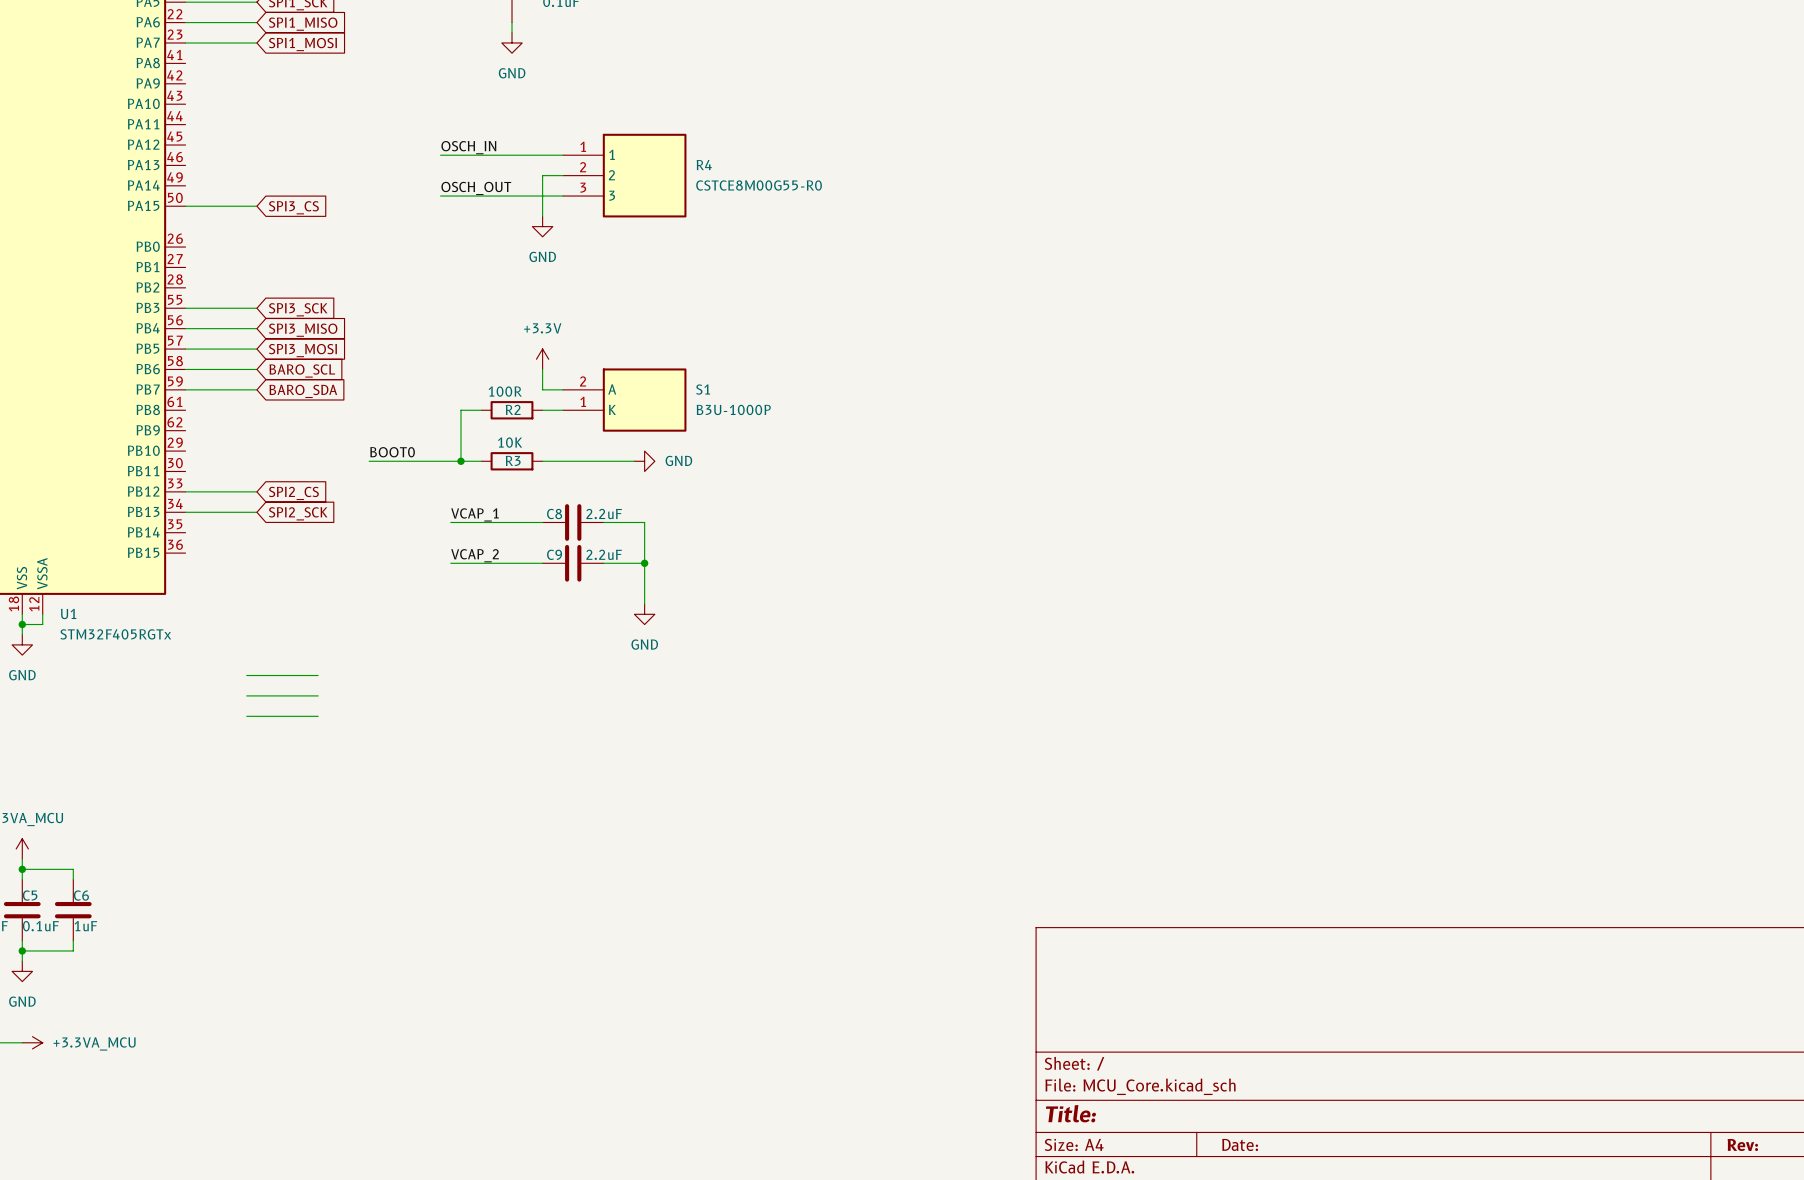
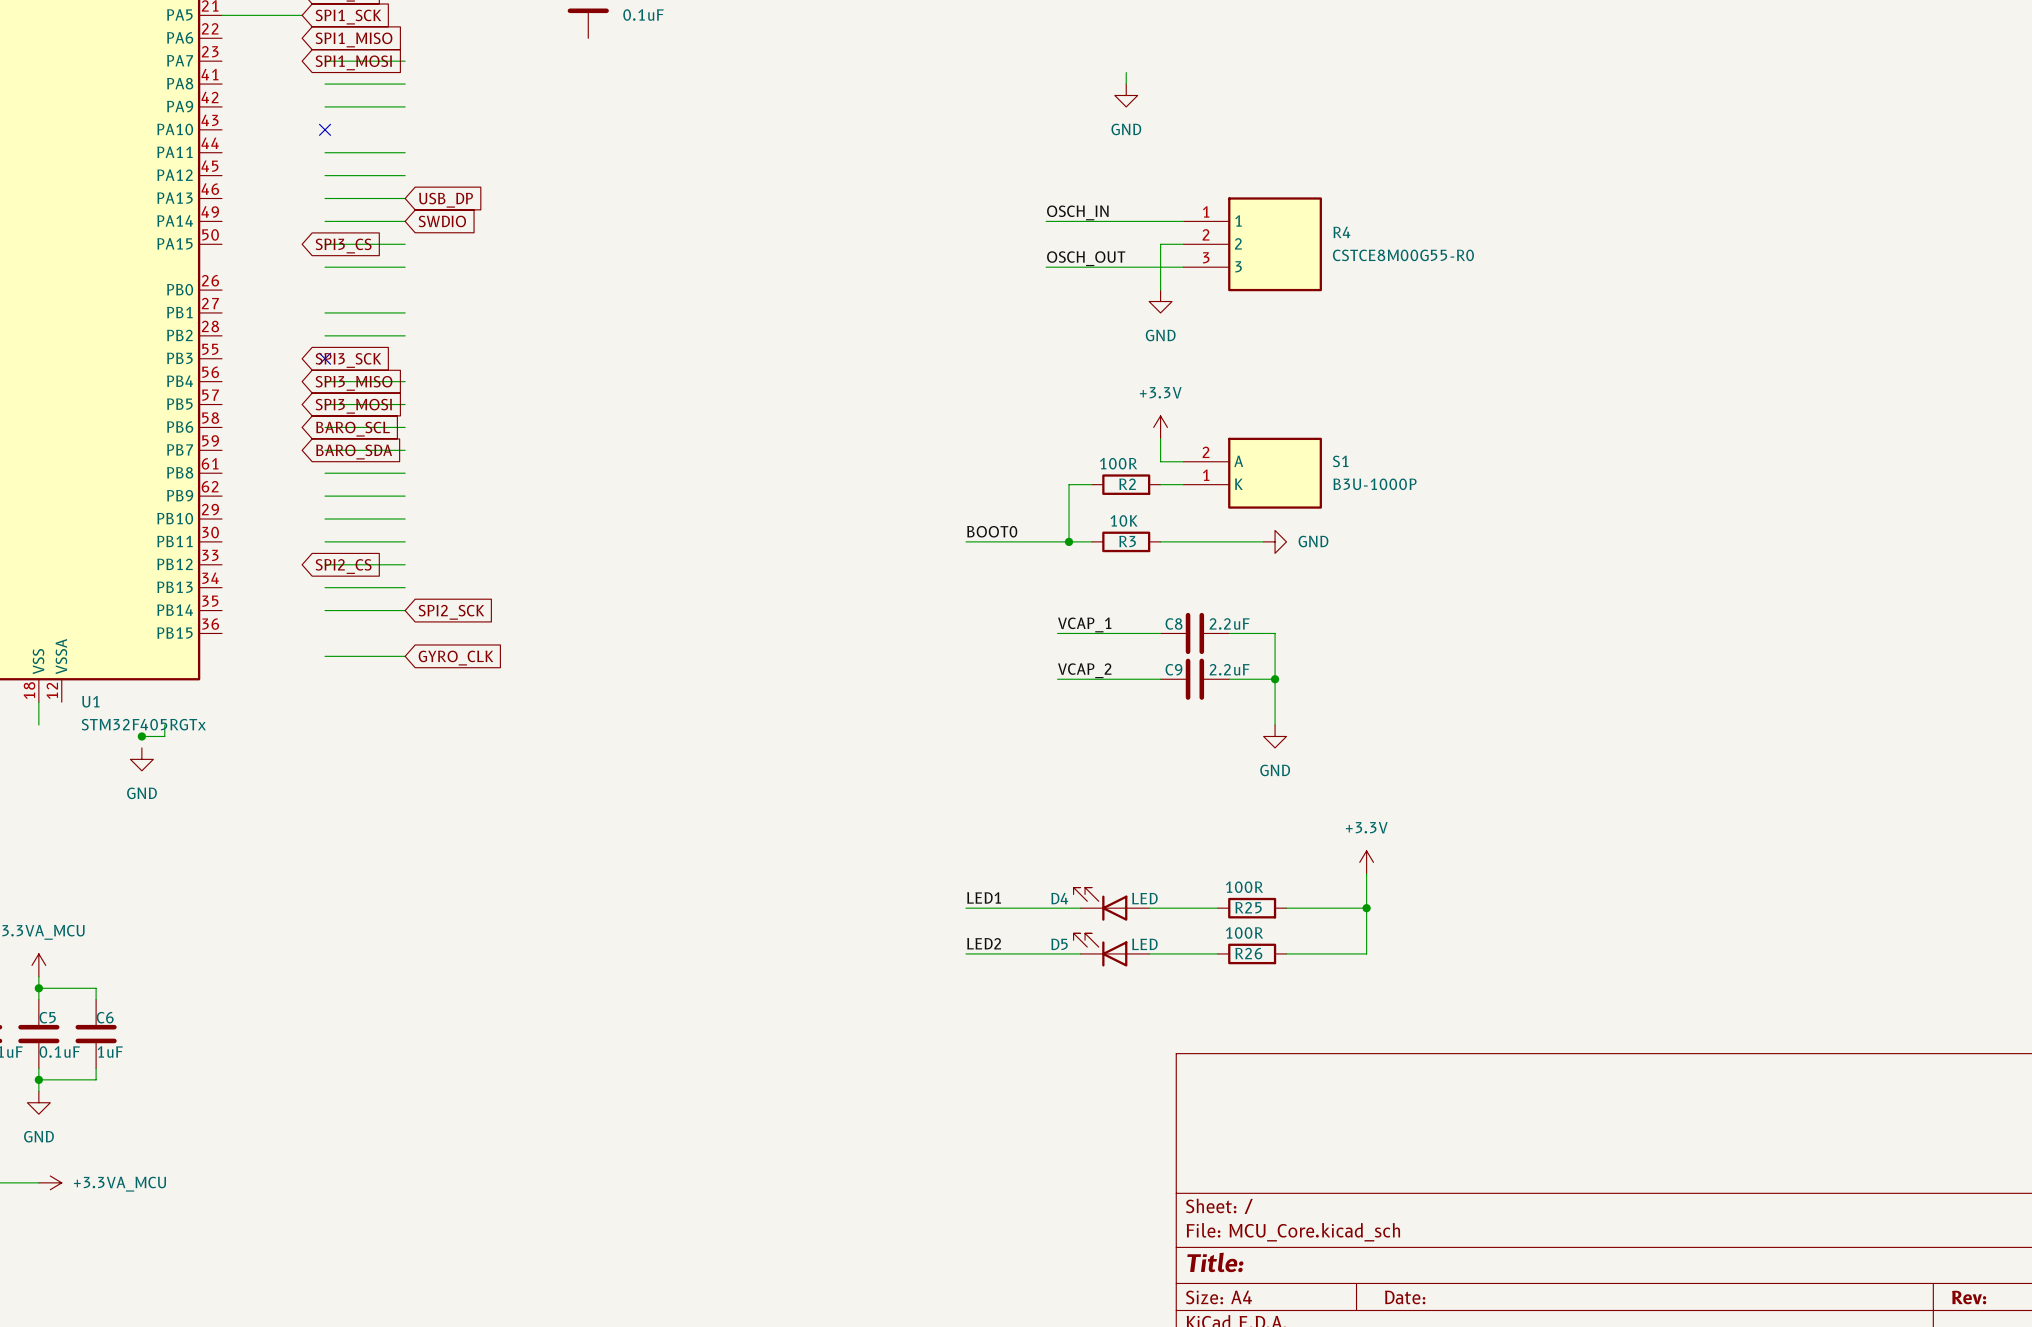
wire: (185, 22) (256, 22) -> (325, 61) (405, 61)
wire: (512, 22) (512, 32) -> none
wire: (185, 42) (256, 42) -> (325, 84) (405, 84)
power symbol: GND (512, 42) -> none
wire: none -> (1126, 72) (1126, 84)
power symbol: none -> GND (1126, 95)
wire: none -> (325, 106) (405, 106)
no-connect mark: none -> (325, 129)
wire: none -> (325, 152) (405, 152)
wire: none -> (325, 175) (405, 175)
label: OSCH_IN (468, 147) -> none
wire: (440, 155) (563, 155) -> none
wire: none -> (325, 198) (405, 198)
global label: none -> USB_DP (446, 200)
wire: (563, 175) (542, 175) (542, 216) -> none
R4 position: (624, 175) -> (1252, 244)
label: none -> OSCH_IN (1077, 212)
wire: none -> (325, 221) (405, 221)
global label: none -> SWDIO (442, 221)
wire: none -> (1046, 221) (1183, 221)
label: OSCH_OUT (476, 188) -> none
wire: (440, 196) (563, 196) -> none
wire: (185, 206) (256, 206) -> (325, 267) (405, 267)
wire: none -> (325, 244) (405, 244)
wire: none -> (1183, 244) (1160, 244) (1160, 290)
label: none -> OSCH_OUT (1086, 258)
power symbol: GND (542, 226) -> none
wire: none -> (1046, 267) (1183, 267)
power symbol: none -> GND (1160, 301)
wire: none -> (325, 312) (405, 312)
wire: none -> (325, 335) (405, 335)
wire: (185, 308) (256, 308) -> (325, 381) (405, 381)
no-connect mark: none -> (325, 358)
wire: (185, 328) (256, 328) -> (325, 404) (405, 404)
wire: (185, 349) (256, 349) -> (325, 427) (405, 427)
power symbol: +3.3V (542, 359) -> none
wire: (185, 369) (256, 369) -> (325, 450) (405, 450)
wire: (542, 369) (542, 389) (563, 389) -> none
power symbol: none -> +3.3V (1160, 427)
wire: none -> (1160, 438) (1160, 461) (1183, 461)
wire: (185, 389) (256, 389) -> (325, 473) (405, 473)
S1 position: (624, 400) -> (1252, 473)
wire: (481, 410) (460, 410) (460, 461) -> none
R2 position: (512, 410) -> (1126, 484)
wire: (542, 410) (563, 410) -> none
wire: none -> (1091, 484) (1069, 484) (1069, 541)
wire: none -> (1160, 484) (1183, 484)
wire: none -> (325, 496) (405, 496)
wire: none -> (325, 519) (405, 519)
label: BOOT0 (392, 452) -> none
wire: (369, 461) (481, 461) -> none
junction: (460, 461) -> none
R3 position: (512, 461) -> (1126, 541)
wire: (542, 461) (634, 461) -> none
power symbol: GND (644, 461) -> none
label: none -> BOOT0 (992, 531)
wire: none -> (325, 541) (405, 541)
wire: none -> (966, 541) (1091, 541)
junction: none -> (1069, 541)
wire: none -> (1160, 541) (1263, 541)
power symbol: none -> GND (1275, 541)
wire: (185, 491) (256, 491) -> (325, 587) (405, 587)
wire: (185, 512) (256, 512) -> (325, 610) (405, 610)
global label position: SPI2_SCK (298, 513) -> SPI2_SCK (451, 612)
label: VCAP_1 (475, 514) -> none
wire: (450, 522) (542, 522) -> none
C8 position: (573, 522) -> (1194, 633)
wire: (603, 522) (644, 522) (644, 604) -> none
label: none -> VCAP_1 (1084, 624)
wire: none -> (1057, 633) (1160, 633)
wire: none -> (1229, 633) (1275, 633) (1275, 725)
label: VCAP_2 (475, 555) -> none
wire: (450, 563) (542, 563) -> none
C9 position: (573, 563) -> (1194, 679)
wire: (603, 563) (644, 563) -> none
junction: (644, 563) -> none
global label: none -> GYRO_CLK (455, 658)
label: none -> VCAP_2 (1084, 670)
wire: none -> (1057, 679) (1160, 679)
wire: none -> (1229, 679) (1275, 679)
junction: none -> (1275, 679)
wire: (42, 614) (42, 624) (22, 624) -> (164, 725) (164, 736) (141, 736)
power symbol: GND (644, 614) -> none
junction: (22, 624) -> none
power symbol position: GND (22, 644) -> GND (141, 759)
junction: none -> (141, 736)
power symbol: none -> GND (1275, 736)
wire: (246, 675) (318, 675) -> (325, 564) (405, 564)
wire: (246, 695) (318, 695) -> none
wire: (246, 716) (318, 716) -> (325, 656) (405, 656)
power symbol: none -> +3.3V (1366, 862)
wire: none -> (1366, 873) (1366, 953) (1286, 953)
label: none -> LED1 (984, 897)
D4: none -> LED (1111, 904)
wire: none -> (966, 908) (1080, 908)
wire: none -> (1149, 908) (1217, 908)
R25: none -> 100R (1252, 908)
wire: none -> (1286, 908) (1366, 908)
junction: none -> (1366, 908)
label: none -> LED2 (984, 943)
D5: none -> LED (1111, 949)
wire: none -> (966, 953) (1080, 953)
wire: none -> (1149, 953) (1217, 953)
R26: none -> 100R (1252, 953)

